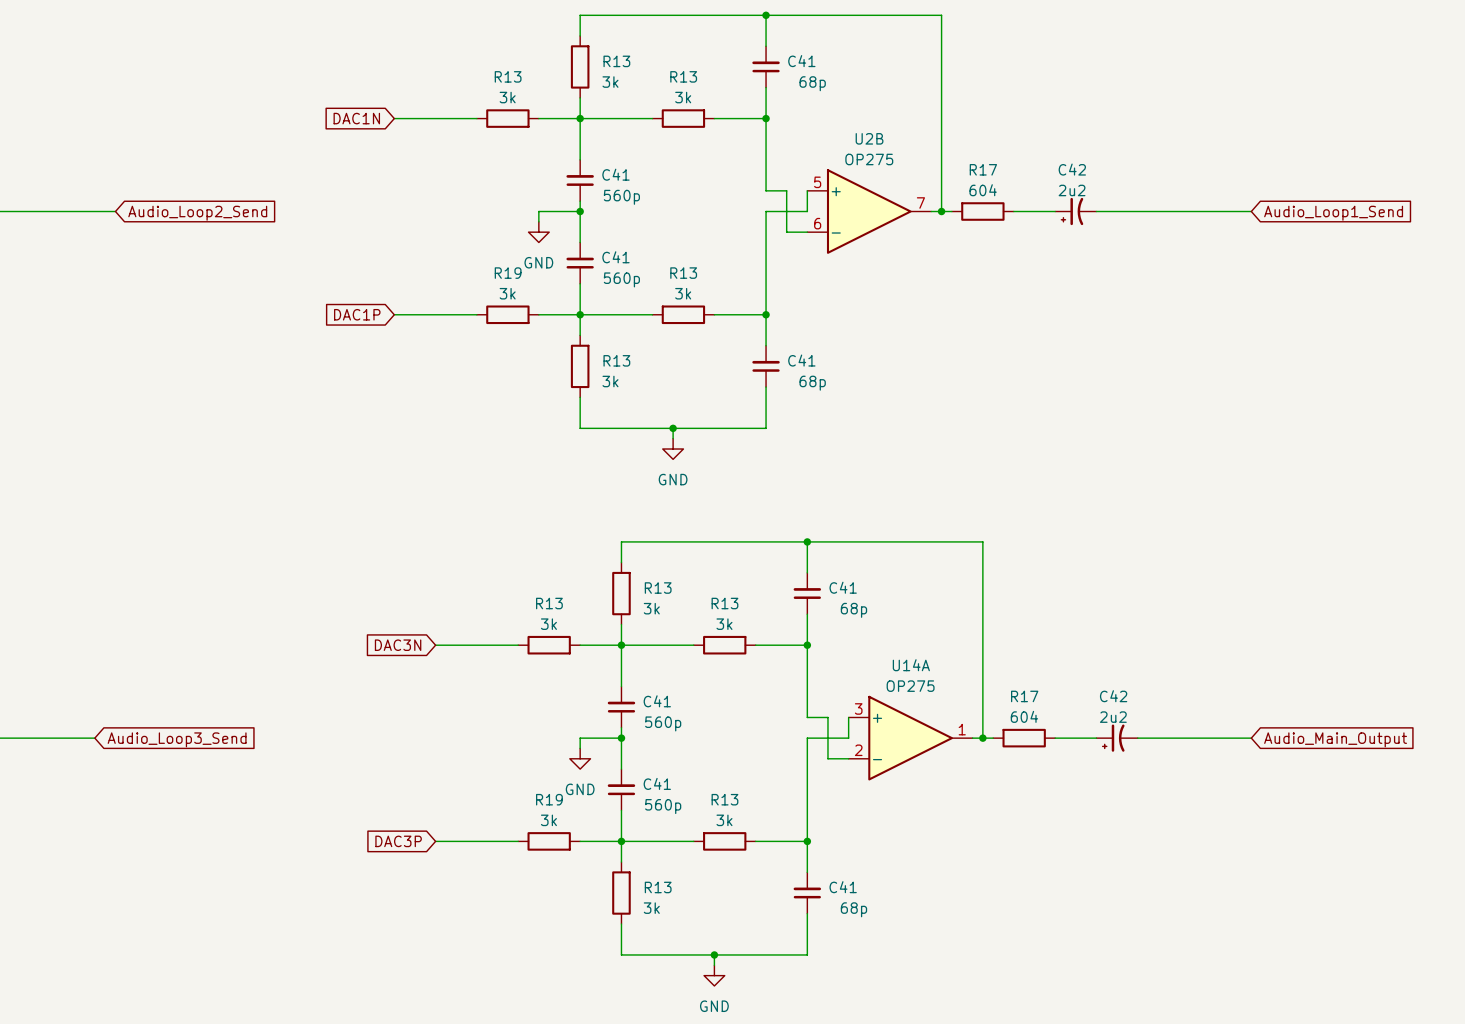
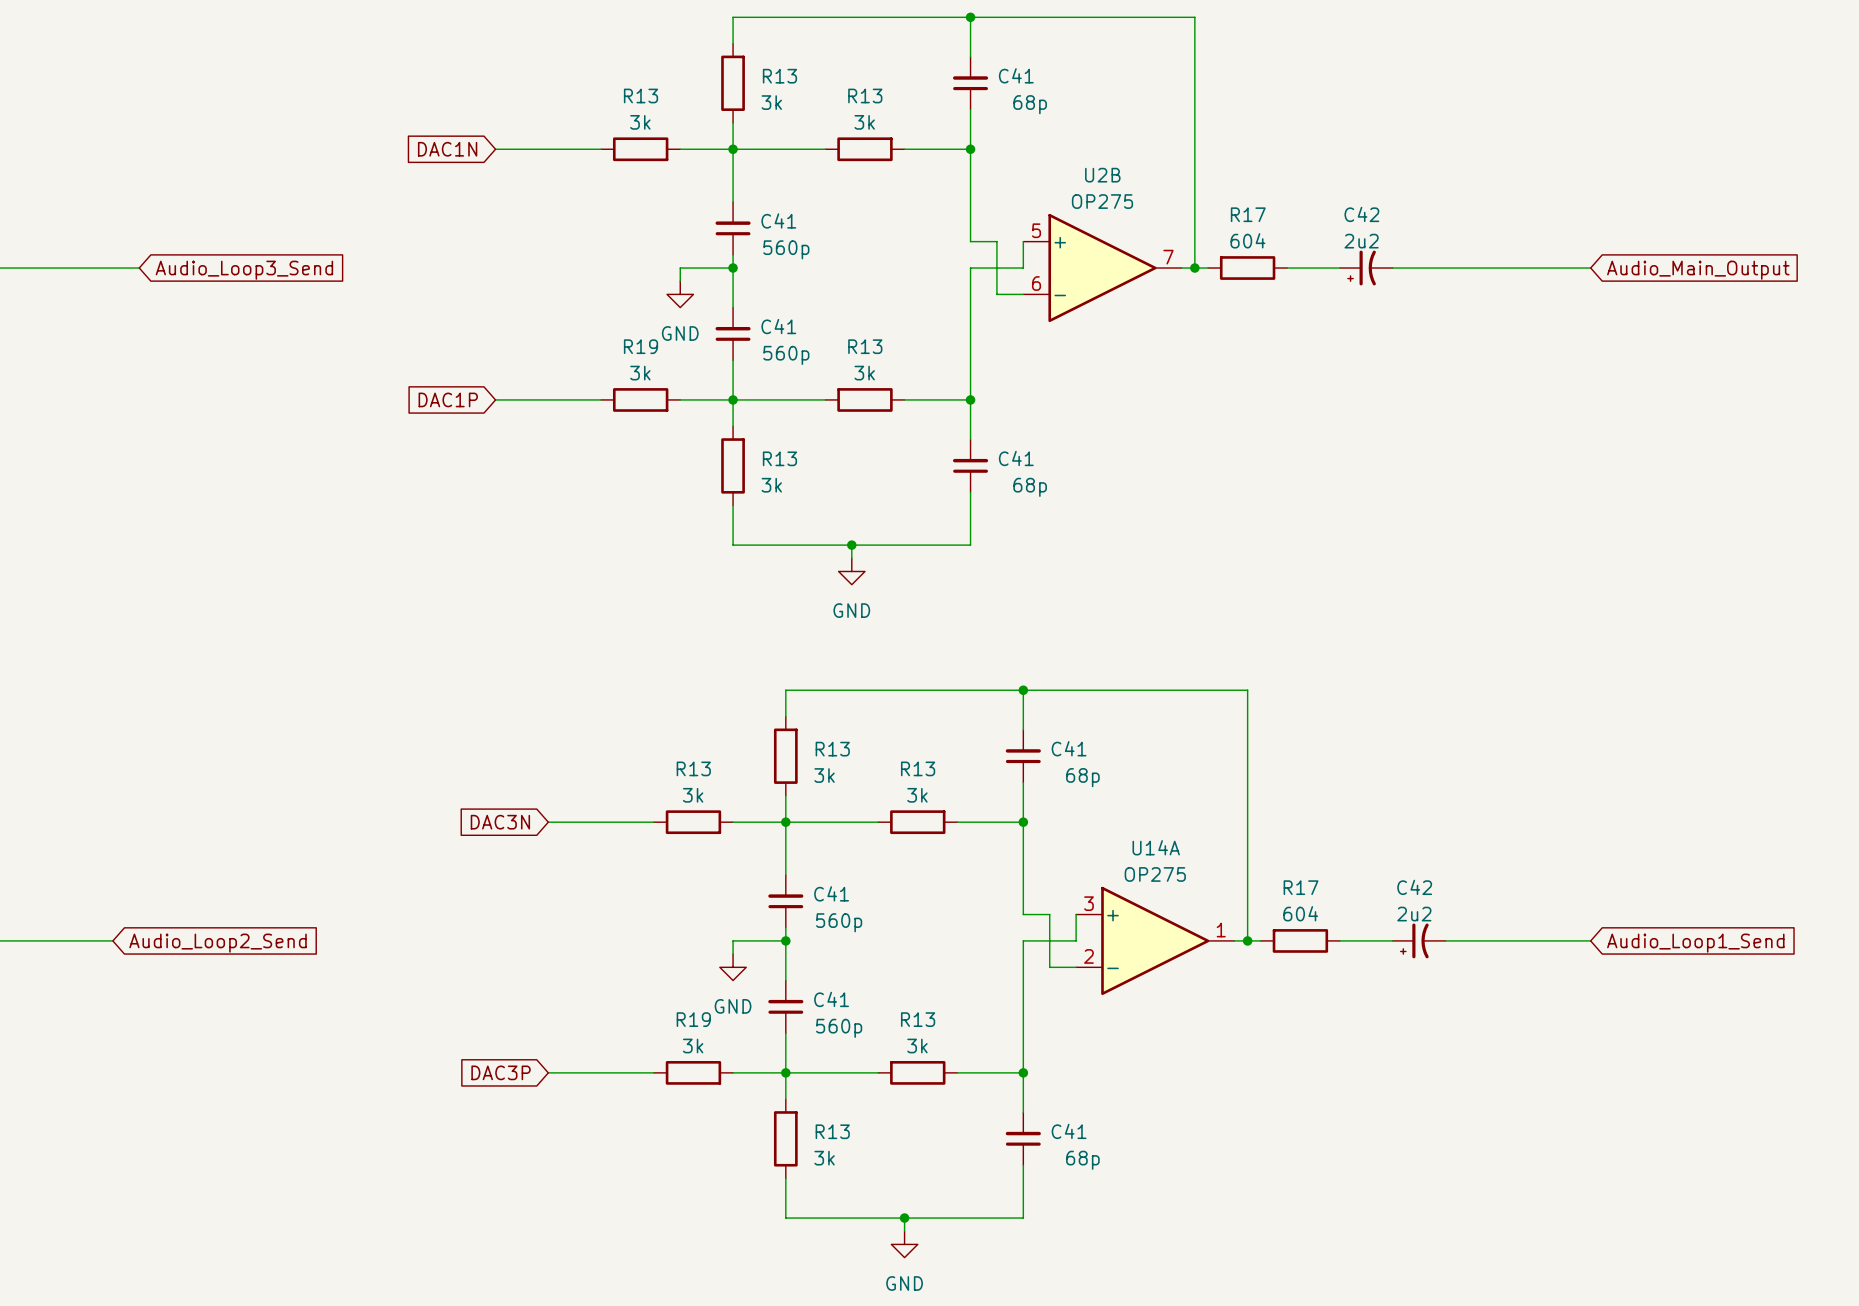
global label: Audio_Loop2_Send (197, 213) -> Audio_Loop3_Send (244, 270)
global label: Audio_Loop1_Send (1333, 213) -> Audio_Main_Output (1698, 270)
global label: Audio_Loop3_Send (177, 739) -> Audio_Loop2_Send (218, 943)
global label: Audio_Main_Output (1335, 739) -> Audio_Loop1_Send (1695, 943)

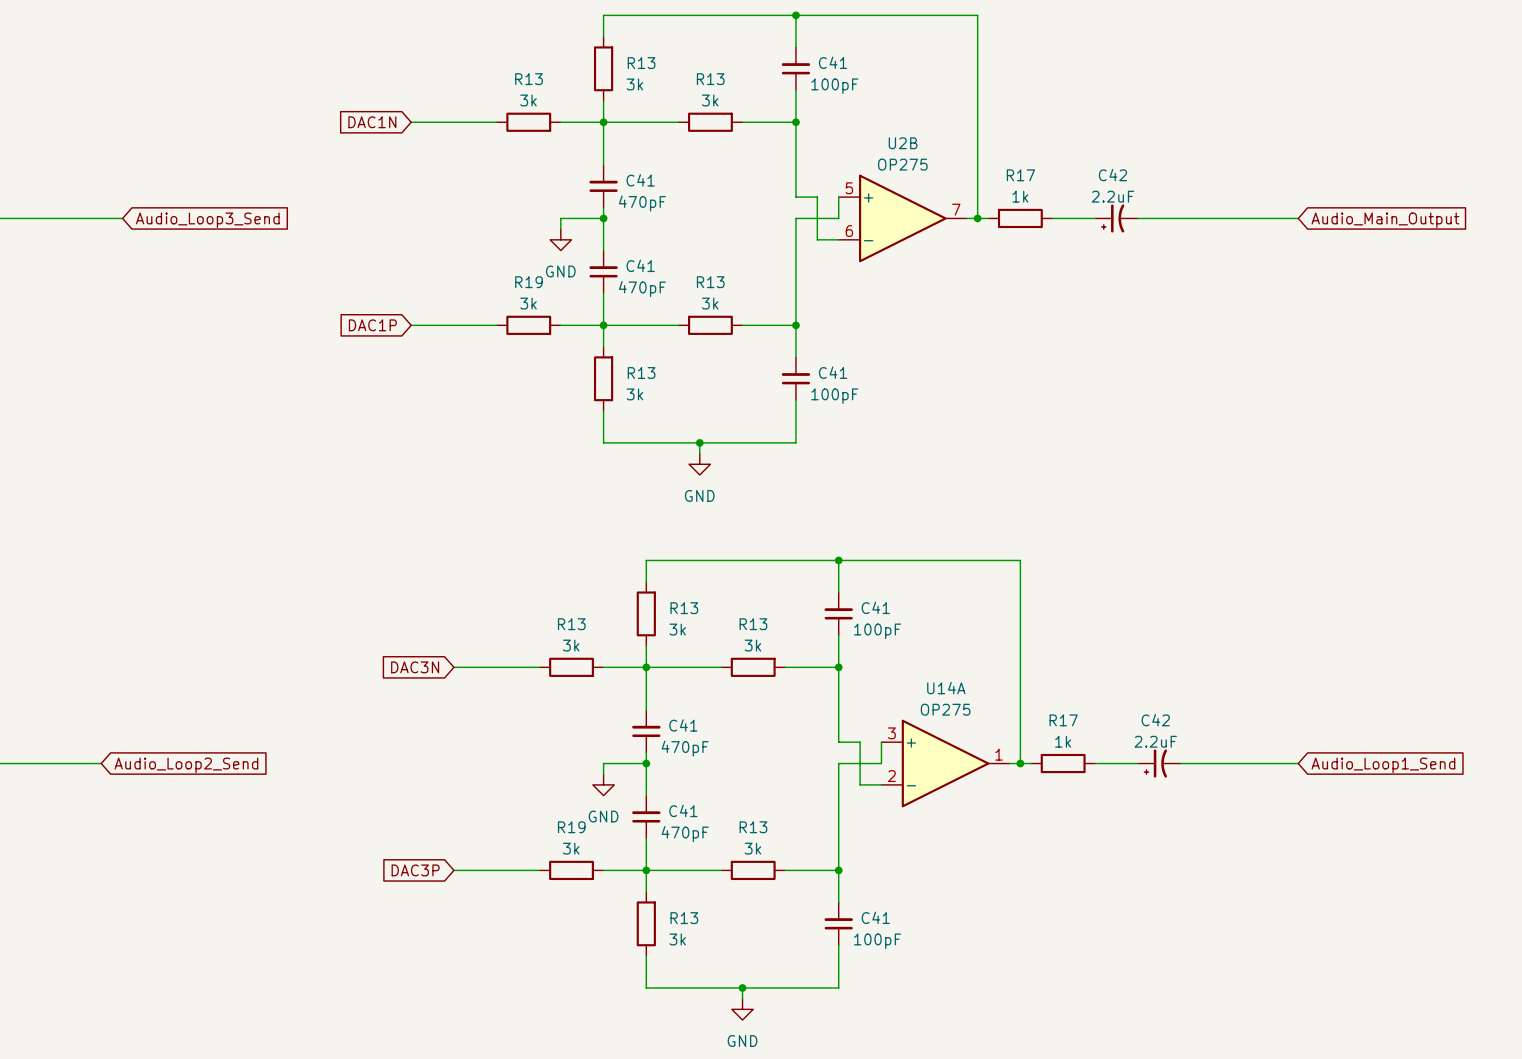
C41 value: 68p (1030, 104) -> 100pF (834, 86)
R17 value: 604 (1247, 240) -> 1k (1020, 196)
C42 value: 2u2 (1361, 241) -> 2.2uF (1112, 196)
C41 value: 560p (786, 249) -> 470pF (642, 203)
C41 value: 560p (786, 355) -> 470pF (642, 289)
C41 value: 68p (1030, 487) -> 100pF (834, 396)
C41 value: 68p (1082, 777) -> 100pF (877, 631)
R17 value: 604 (1300, 913) -> 1k (1063, 741)
C42 value: 2u2 (1414, 914) -> 2.2uF (1155, 741)
C41 value: 560p (839, 922) -> 470pF (685, 748)
C41 value: 560p (839, 1028) -> 470pF (685, 834)
C41 value: 68p (1082, 1160) -> 100pF (877, 941)

